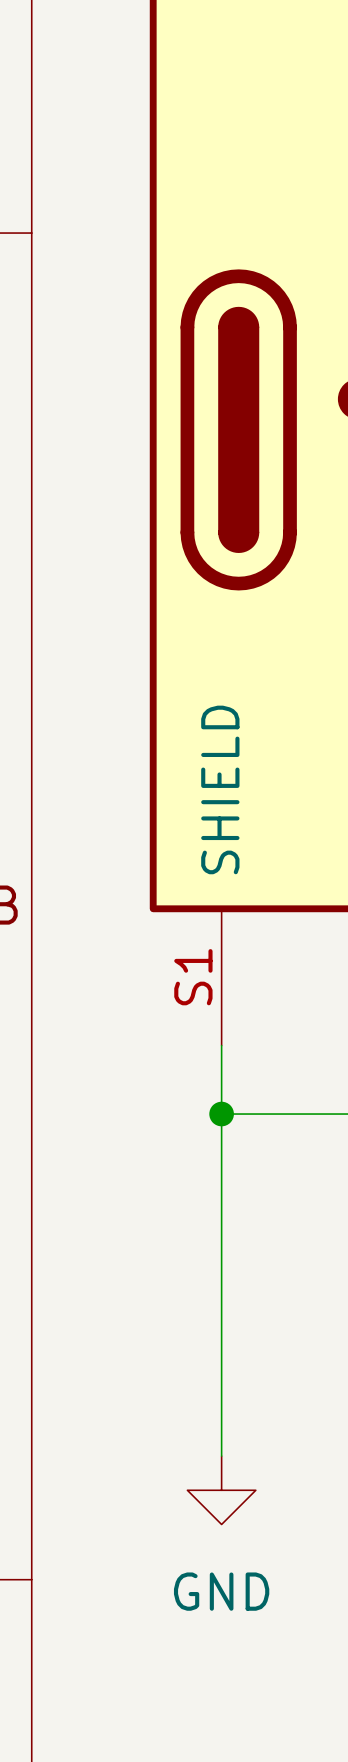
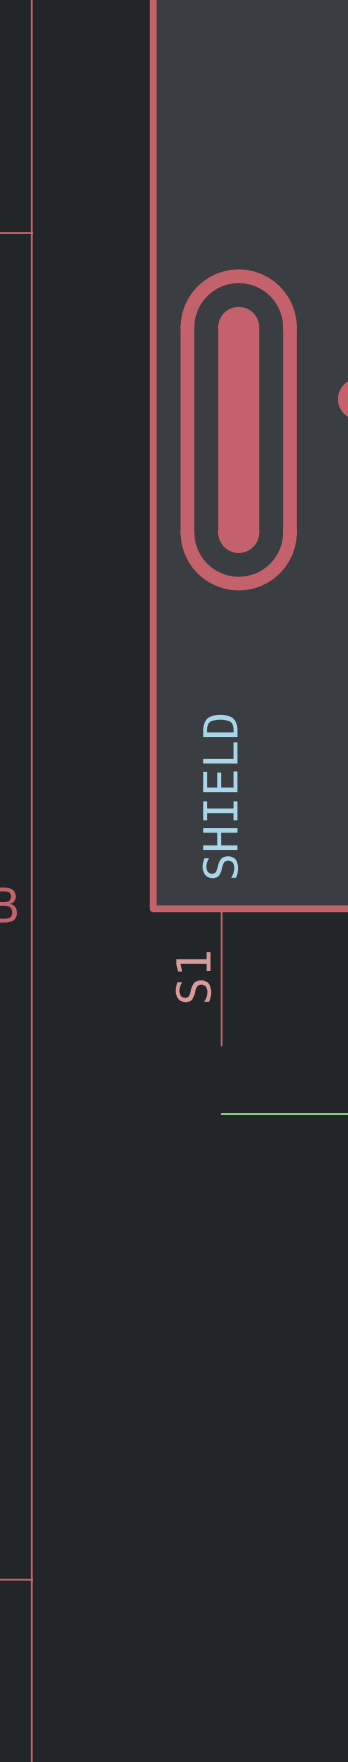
wire: (221, 1045) (221, 1456) -> none
junction: (221, 1114) -> none
power symbol: GND (221, 1490) -> none

